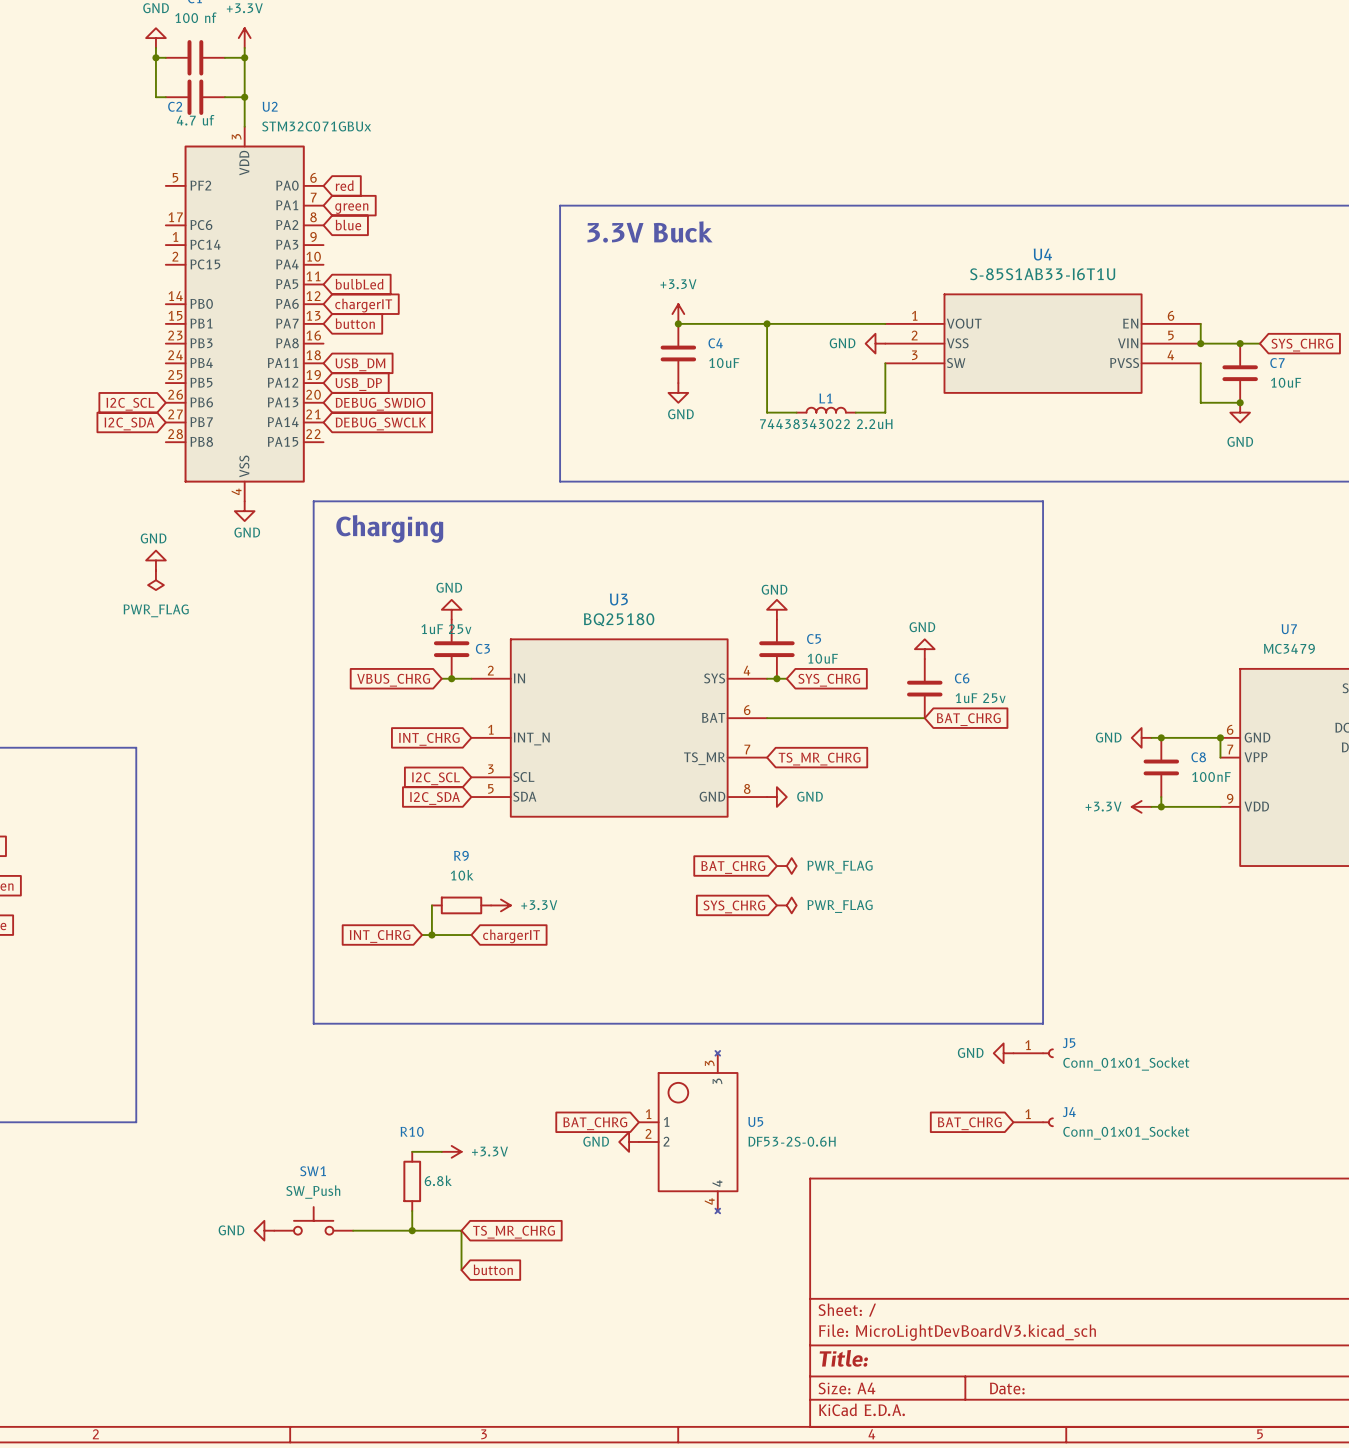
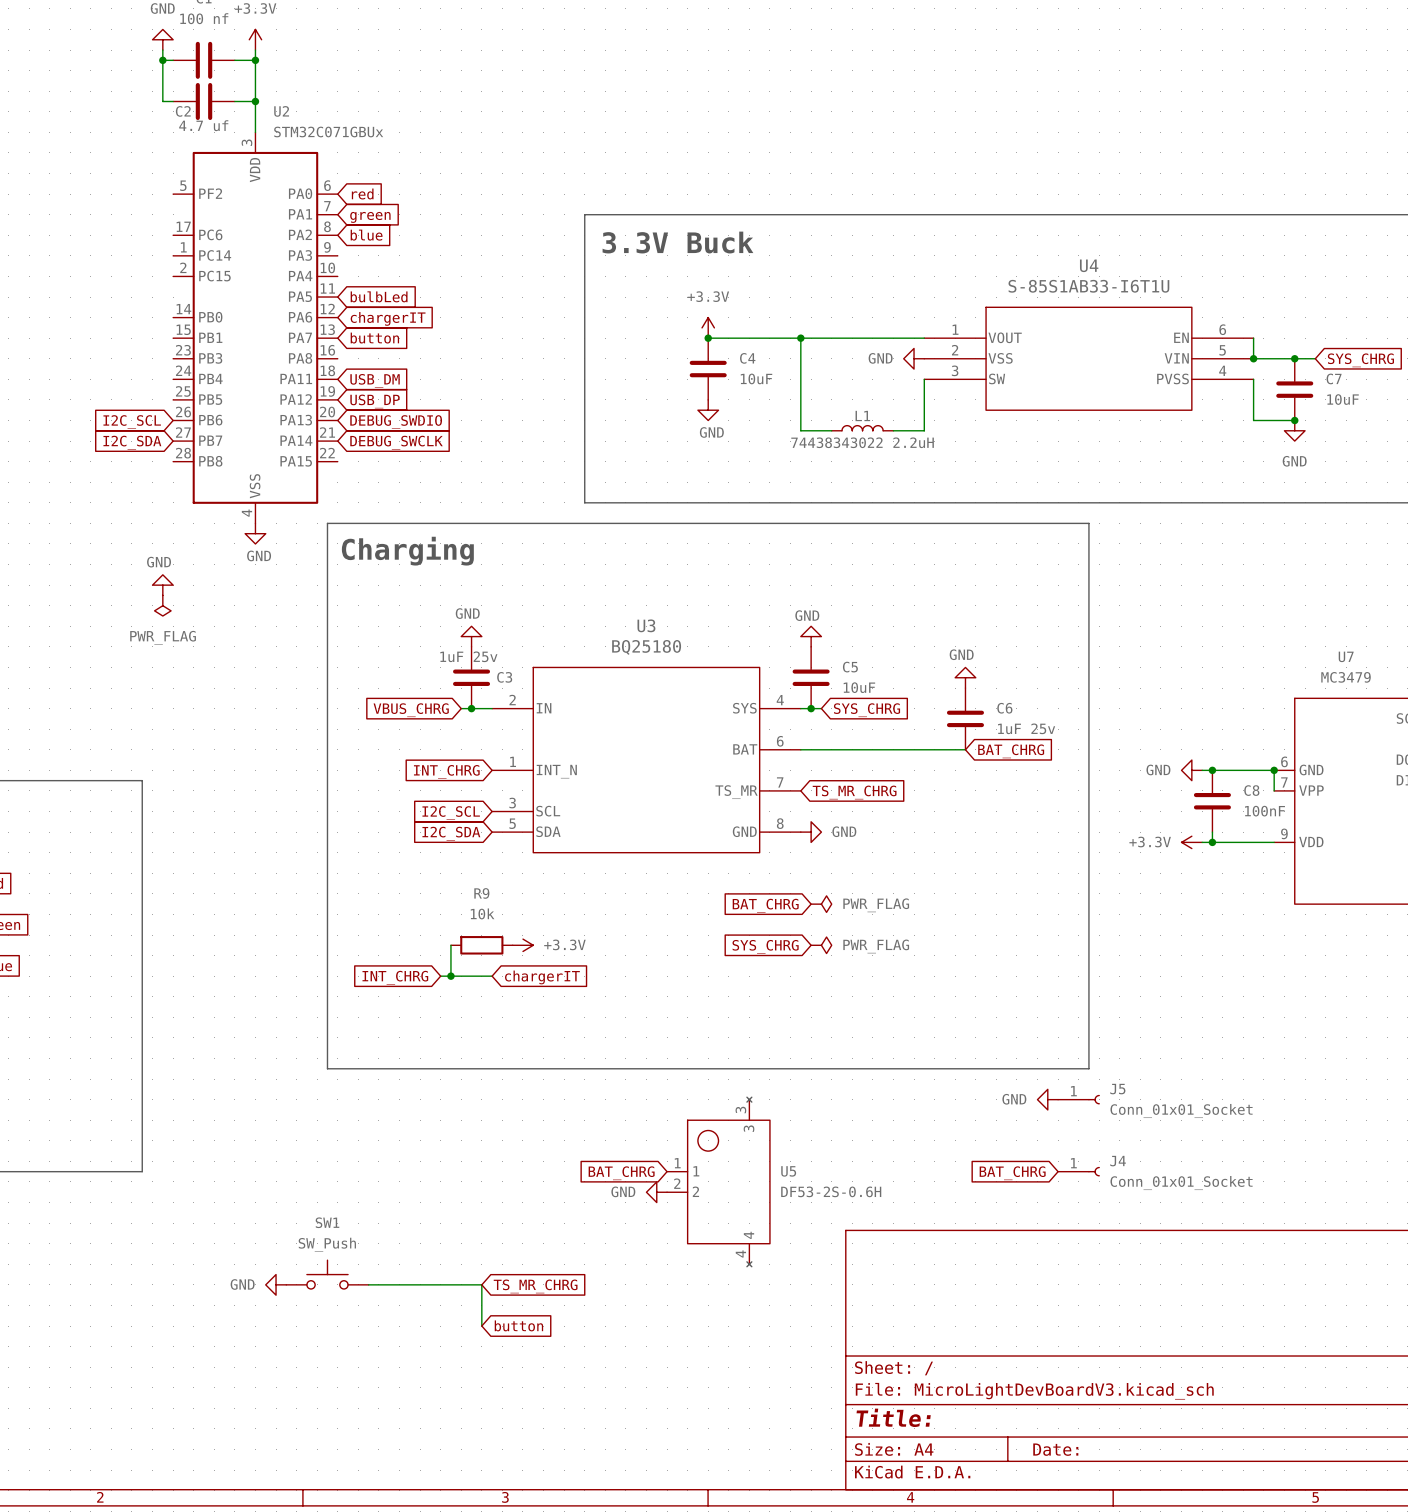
wire: (412, 1151) (441, 1151) -> none
power symbol: +3.3V (451, 1151) -> none
R10: 6.8k (412, 1181) -> none
wire: (412, 1210) (412, 1230) -> none
junction: (412, 1230) -> none

